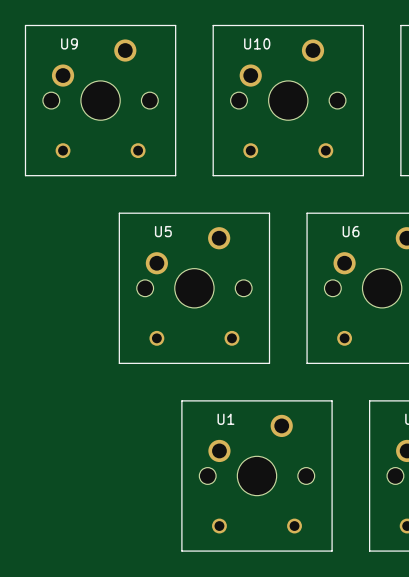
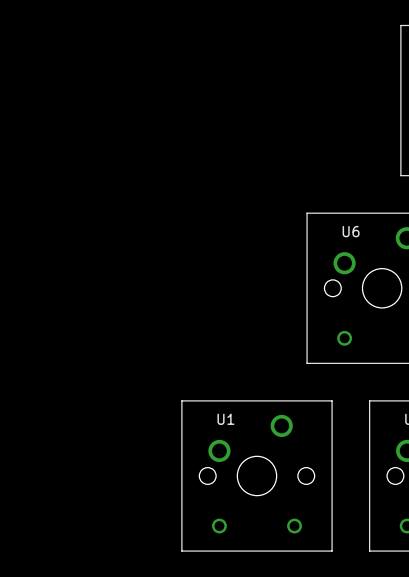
U9: (100, 100) -> none
U10: (288, 100) -> none
U5: (194, 288) -> none

